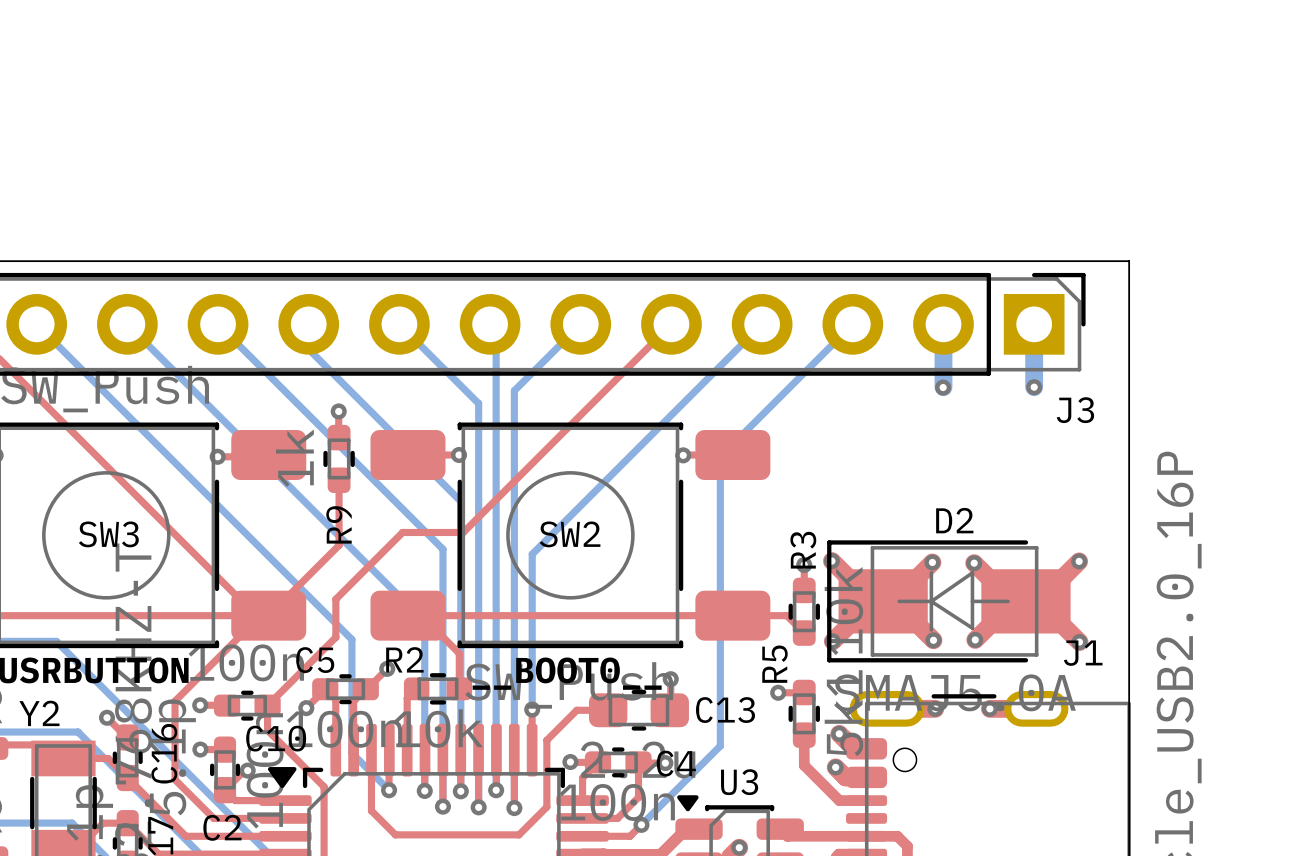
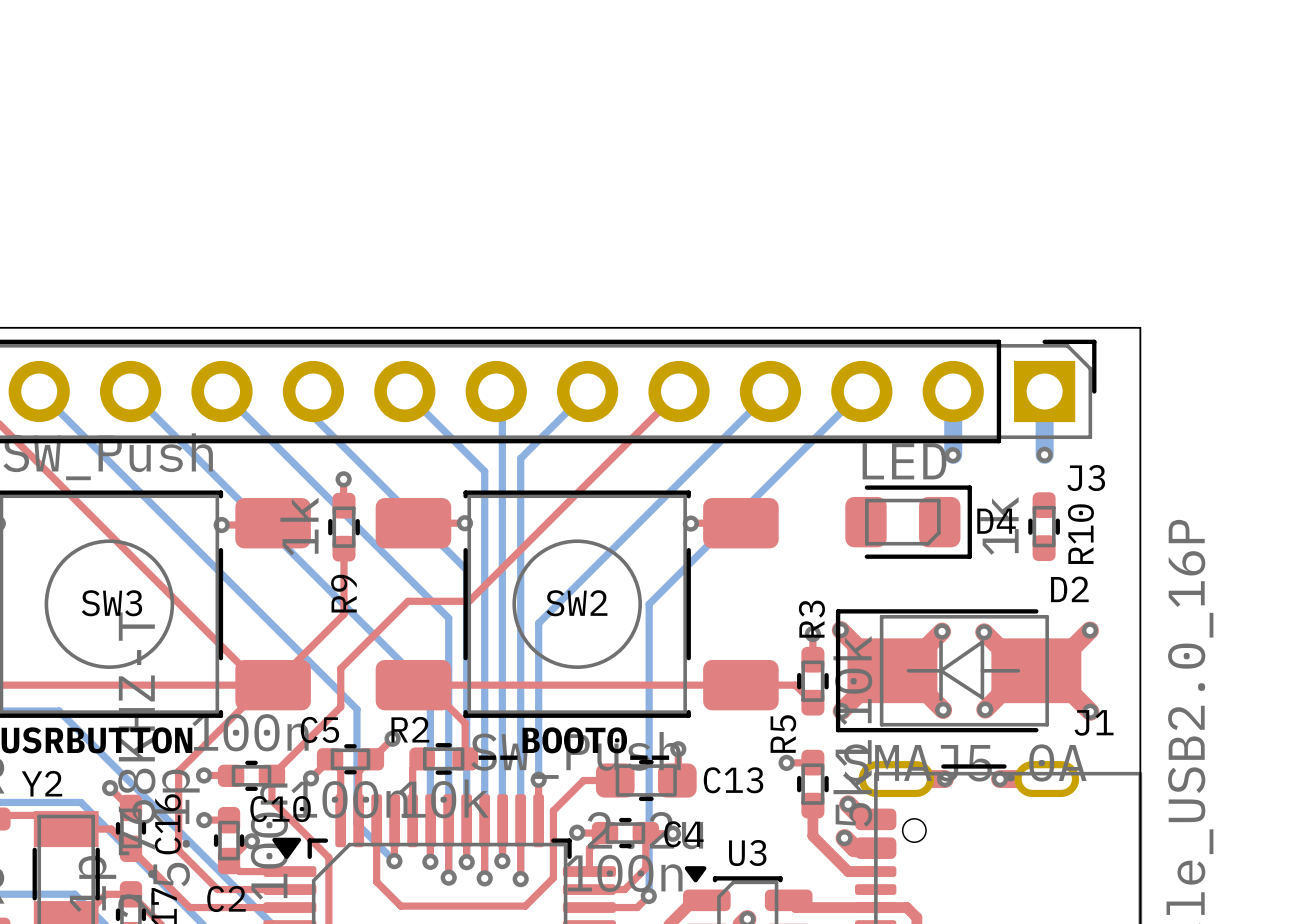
D4: none -> LED (908, 522)
bottom track: (720, 456) (720, 745) (641, 824) -> (728, 525) (649, 604) (649, 895)
R10: none -> 1k (1044, 526)
D2 name position: D2 (954, 520) -> D2 (1069, 589)

